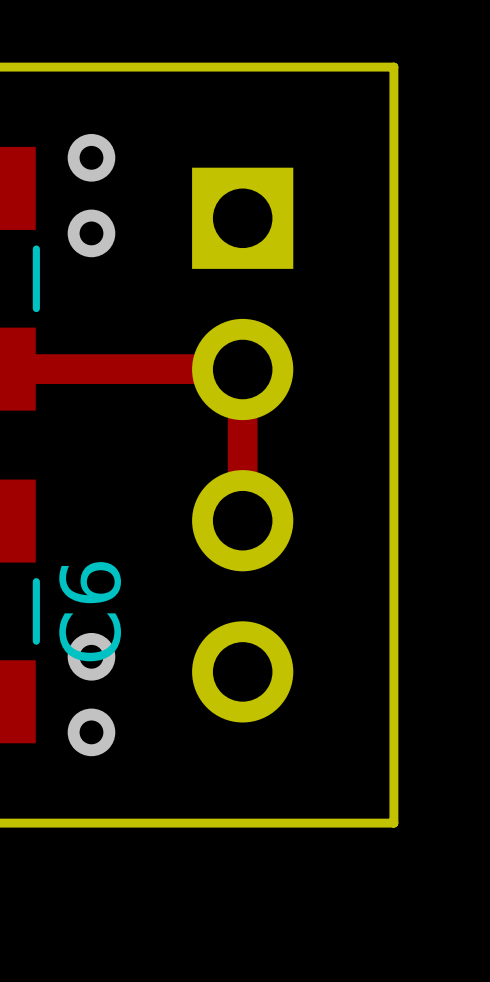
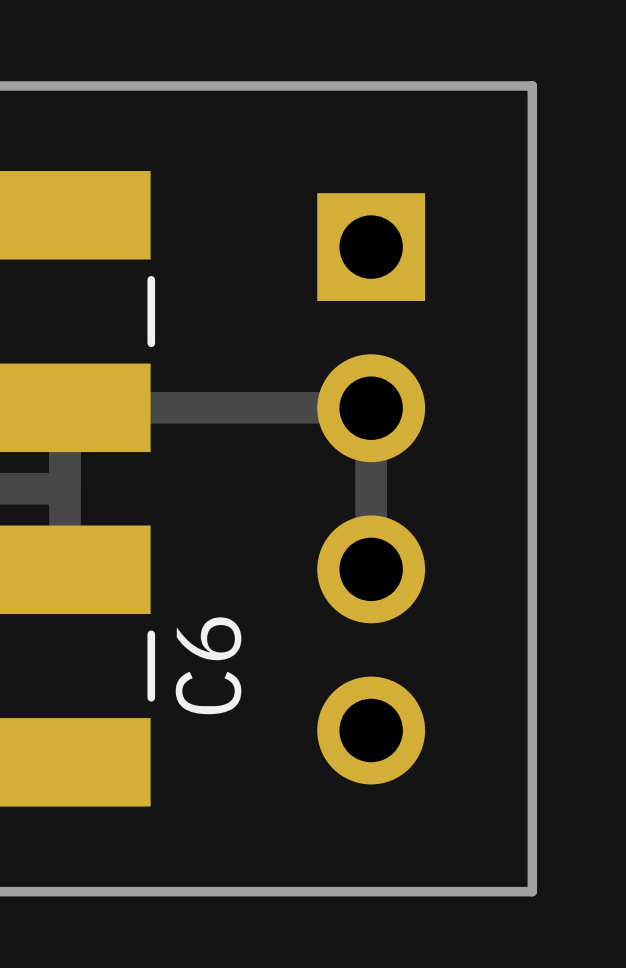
via: (91, 157) -> none
via: (91, 233) -> none
via: (91, 656) -> none
via: (91, 732) -> none

